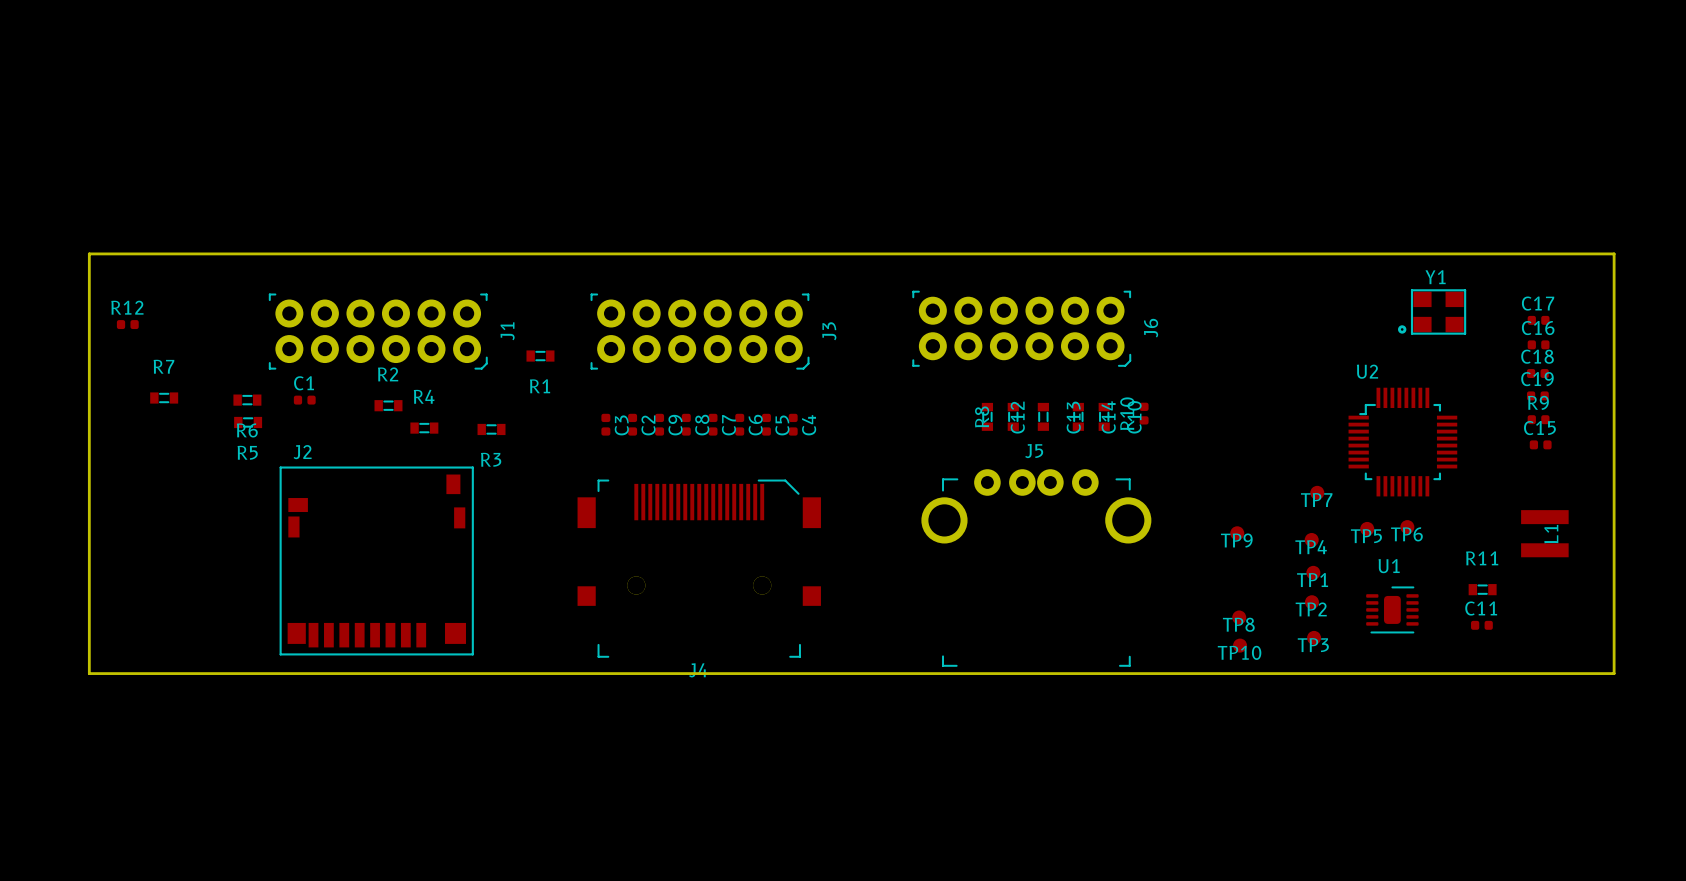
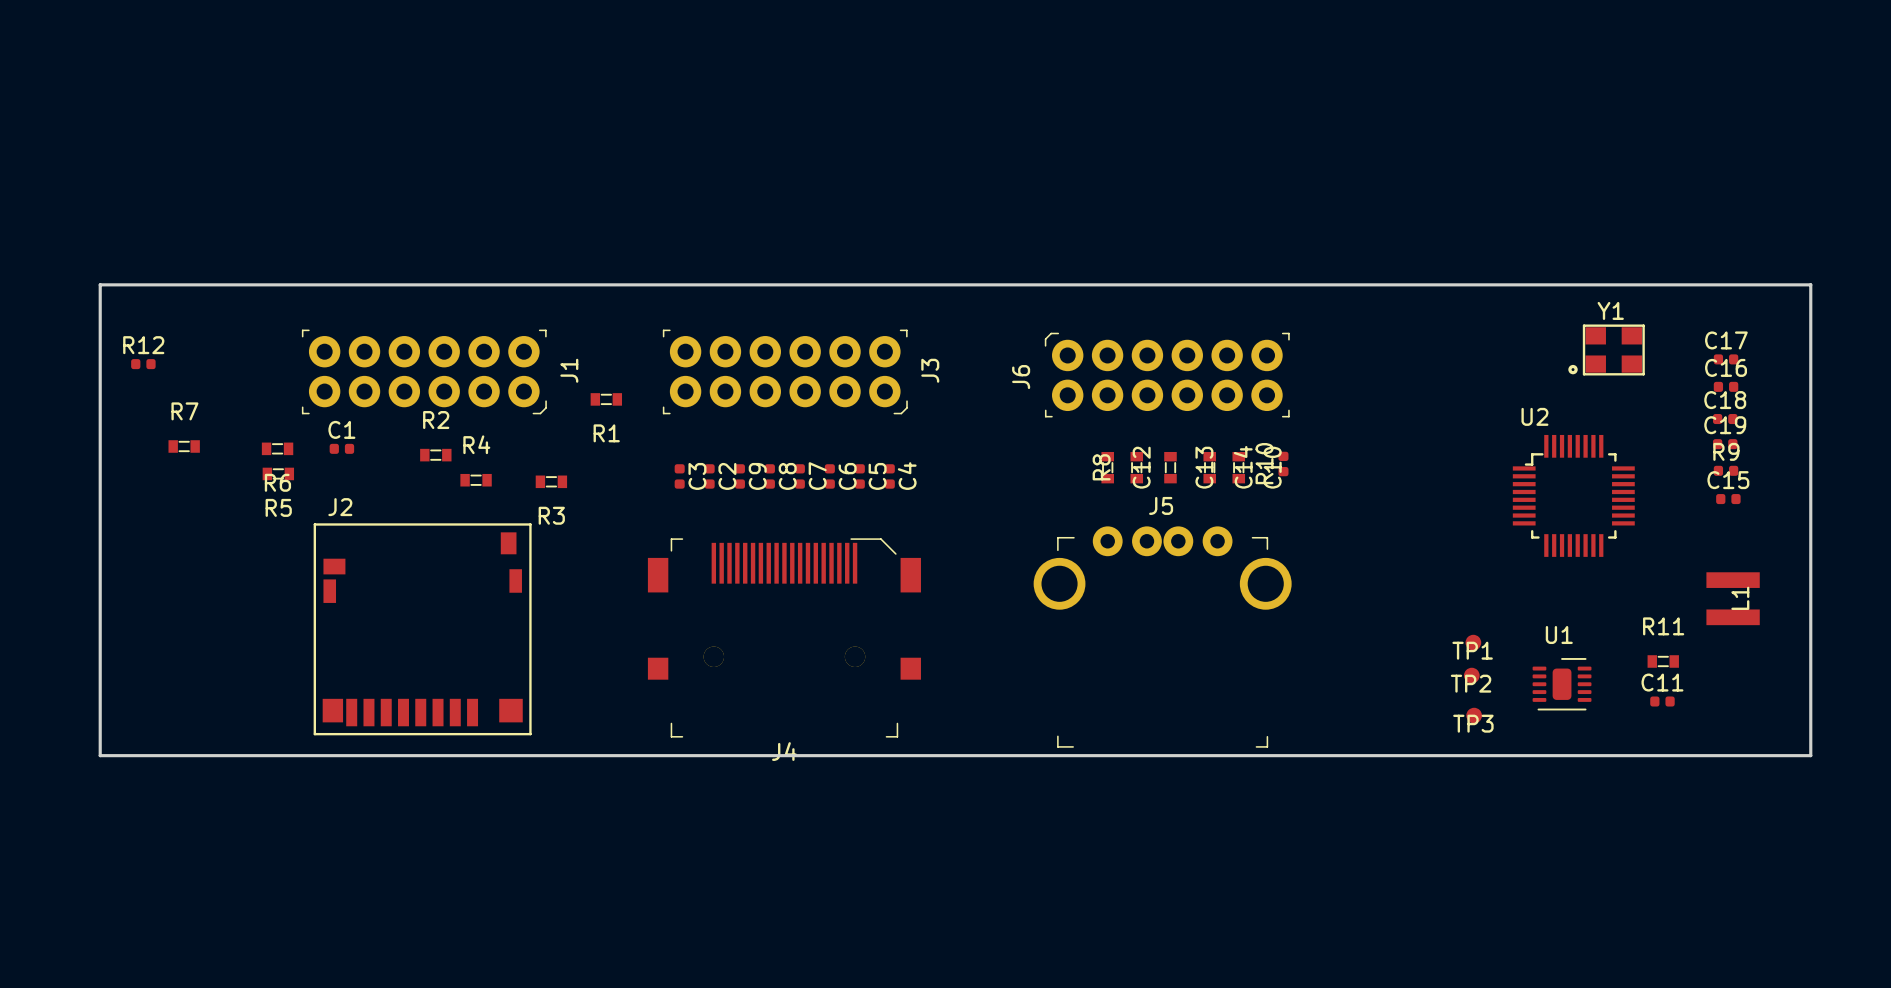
J6 rotation: 0° (1021, 328) -> 180° (1167, 375)
TP7: (1317, 492) -> none
TP6: (1407, 527) -> none
TP5: (1367, 528) -> none
TP9: (1237, 533) -> none
TP4: (1311, 539) -> none
TP8: (1239, 617) -> none
TP10: (1240, 645) -> none

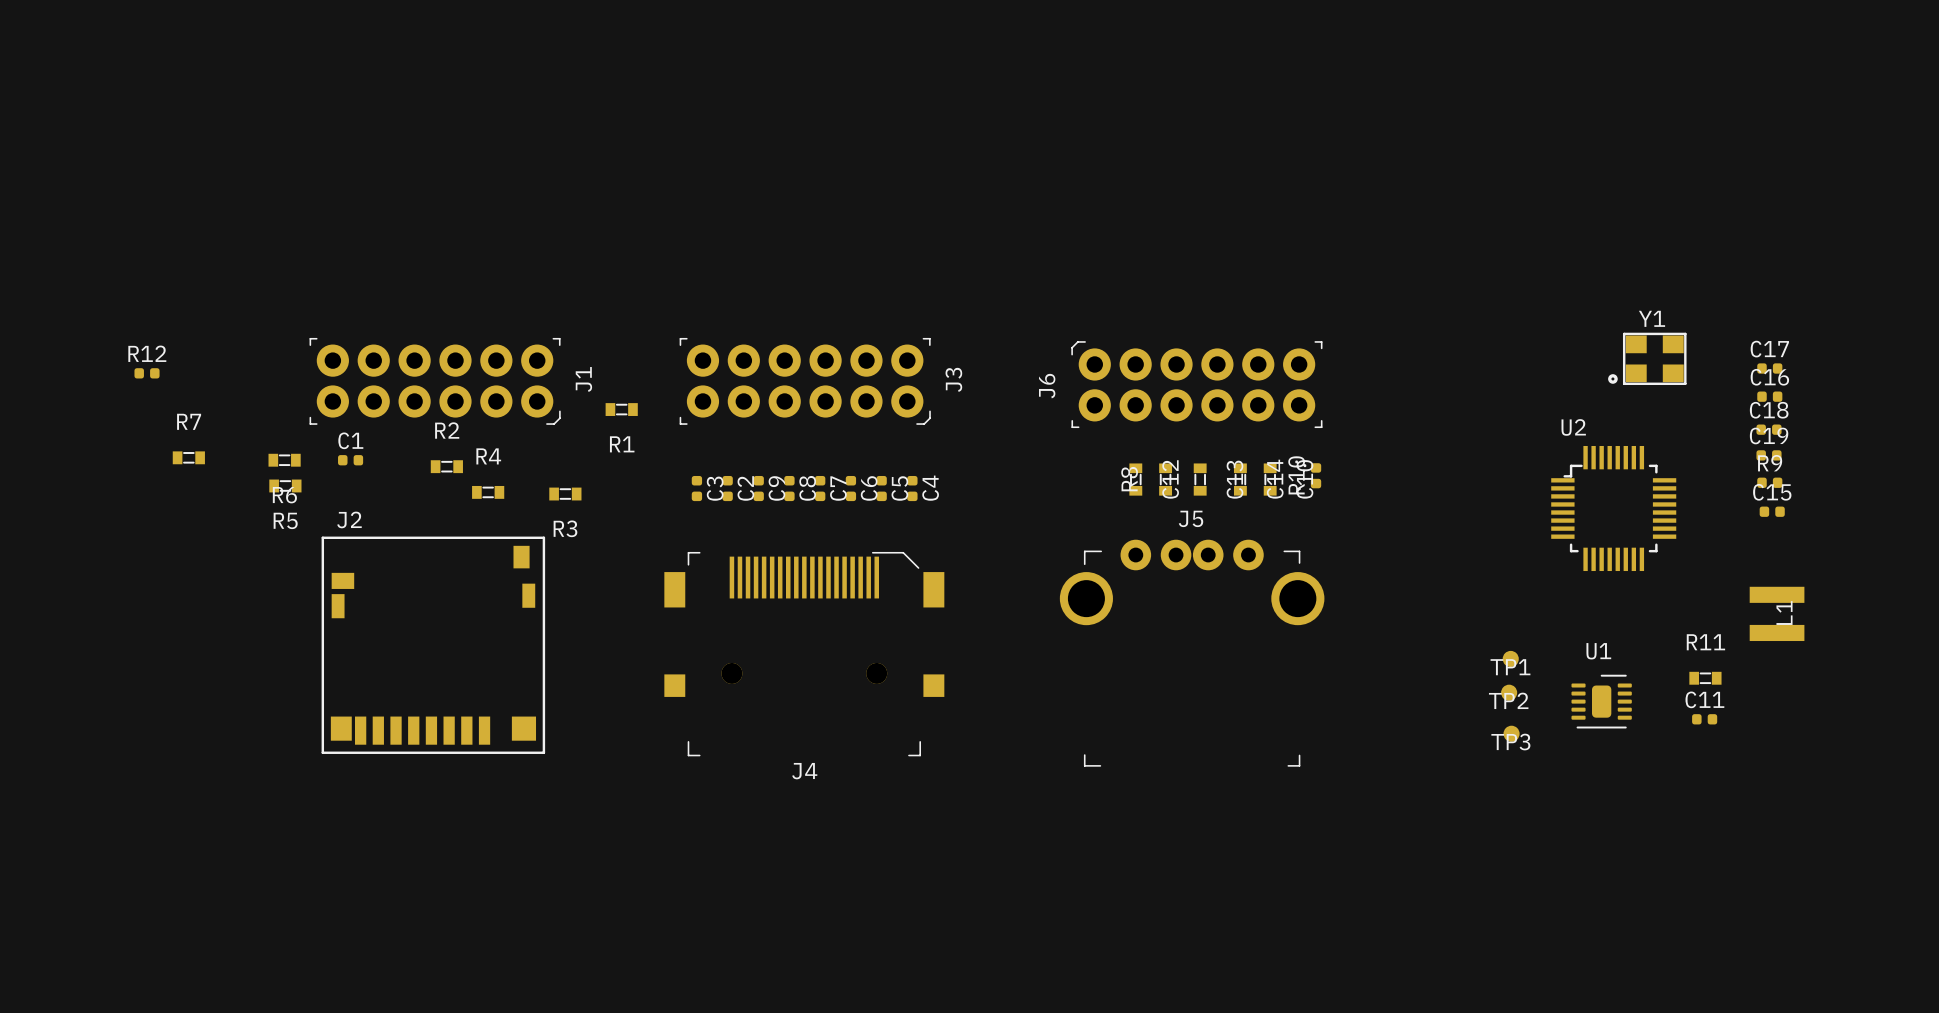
board edge: (100, 284) (100, 755) (1810, 755) (1810, 284) (100, 284) -> none

